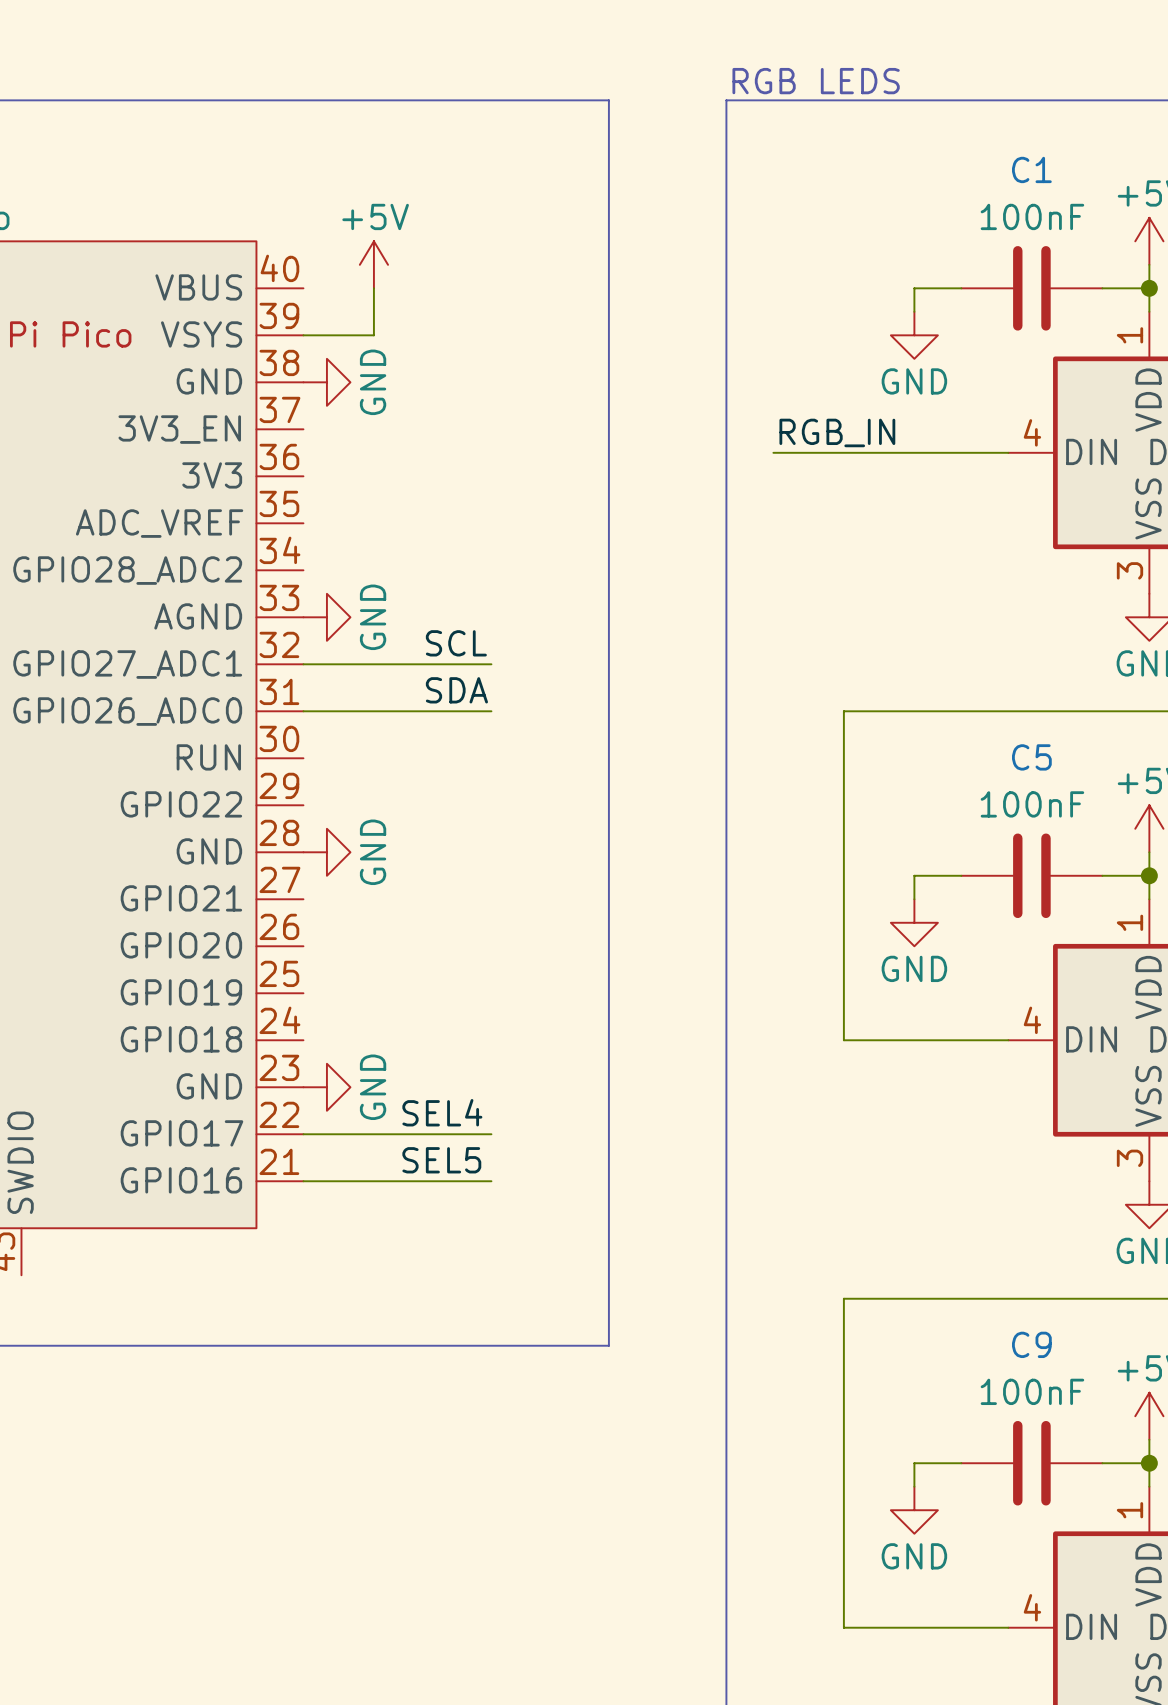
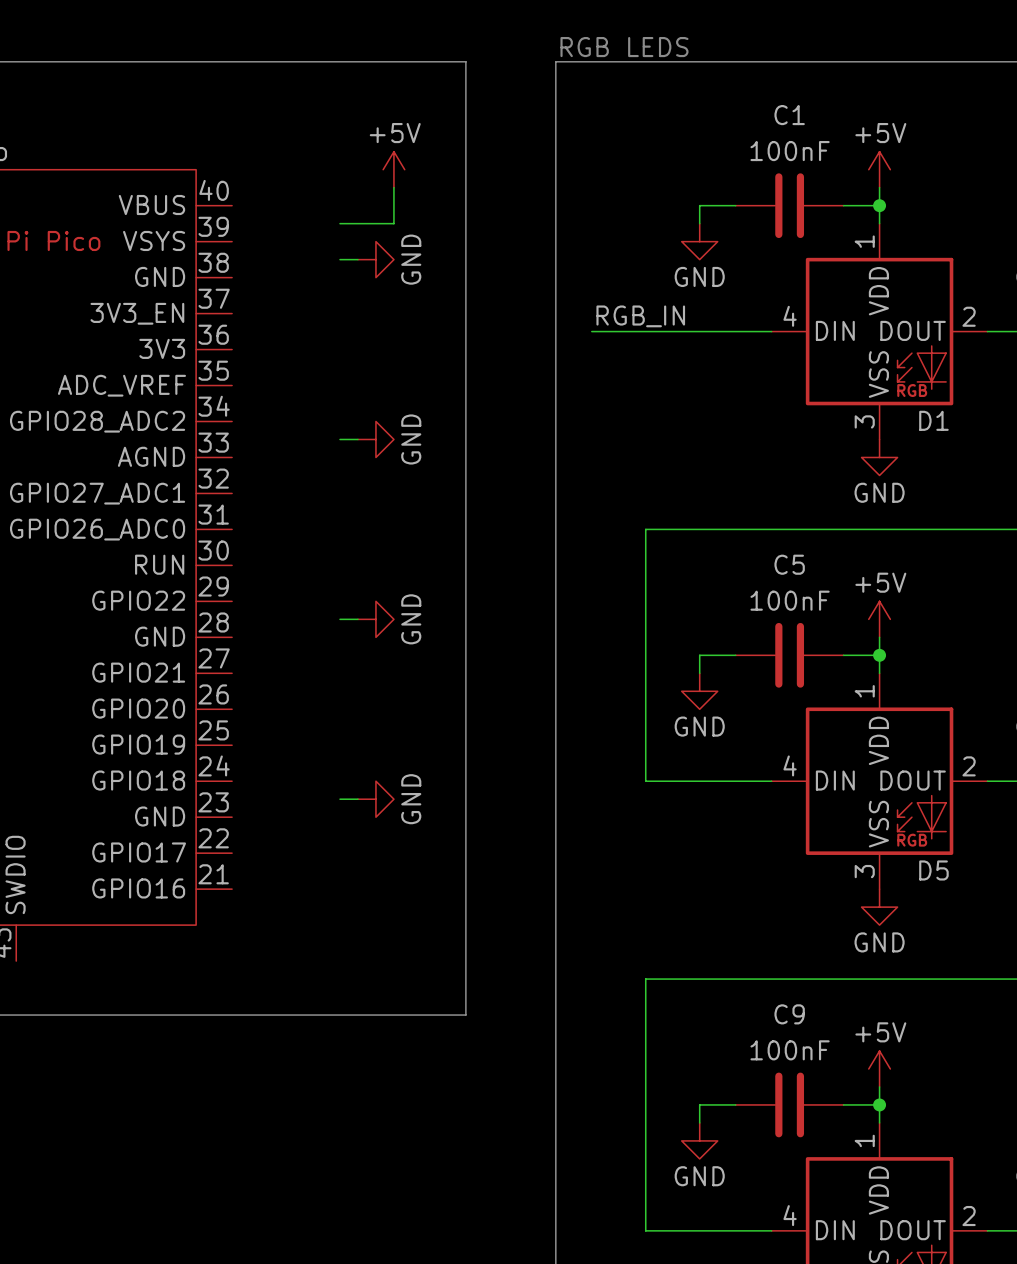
power symbol position: +5V (373, 264) -> +5V (393, 169)
wire: (373, 288) (373, 335) (303, 335) -> (393, 187) (393, 223) (339, 223)
wire: none -> (339, 259) (357, 259)
power symbol: none -> GND (375, 259)
power symbol: GND (326, 382) -> none
wire: none -> (339, 439) (357, 439)
power symbol: none -> GND (375, 439)
power symbol: GND (326, 617) -> none
label: SCL (456, 643) -> none
wire: (303, 664) (491, 664) -> none
label: SDA (456, 690) -> none
wire: (303, 711) (491, 711) -> none
wire: none -> (339, 619) (357, 619)
power symbol: none -> GND (375, 619)
power symbol: GND (326, 852) -> none
wire: none -> (339, 799) (357, 799)
power symbol: none -> GND (375, 799)
power symbol: GND (326, 1087) -> none
label: SEL4 (442, 1112) -> none
wire: (303, 1134) (491, 1134) -> none
label: SEL5 (441, 1160) -> none
wire: (303, 1181) (491, 1181) -> none

